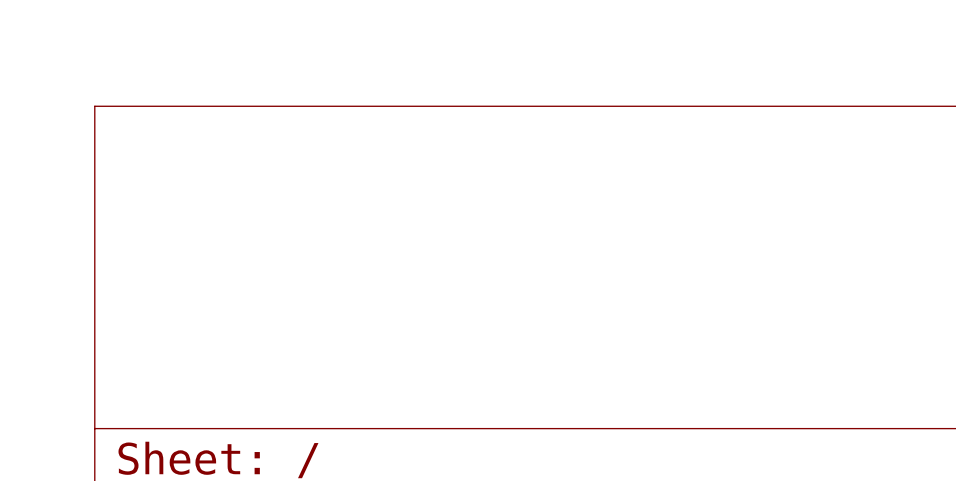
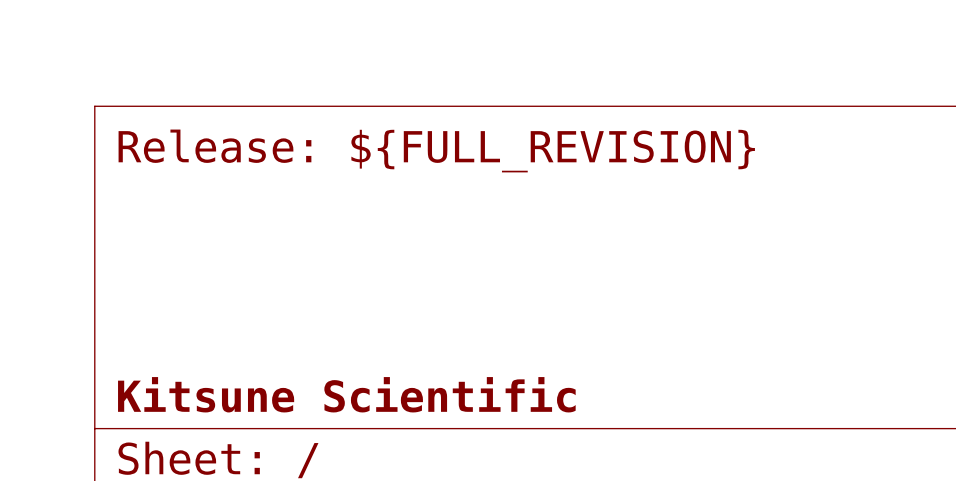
title block: none -> Release: ${FULL_REVISION} (436, 150)
title block: none -> Kitsune Scientific (346, 394)

